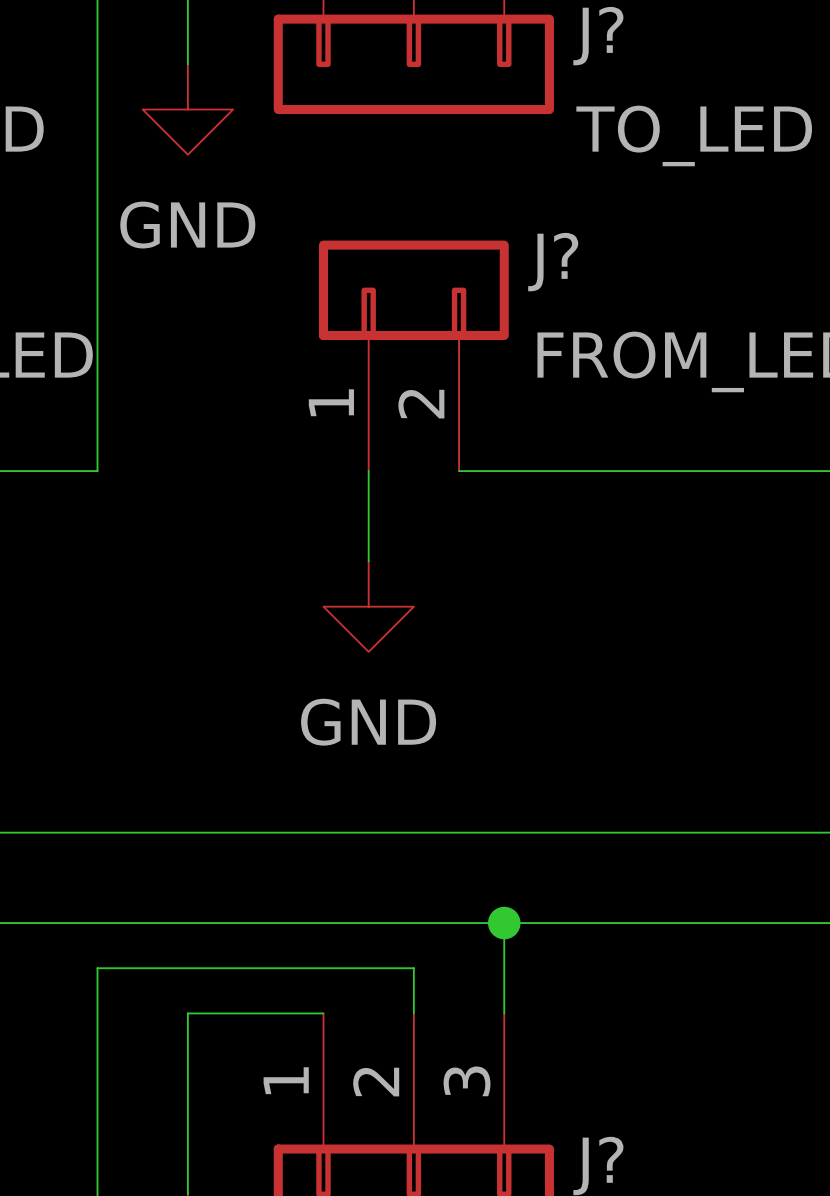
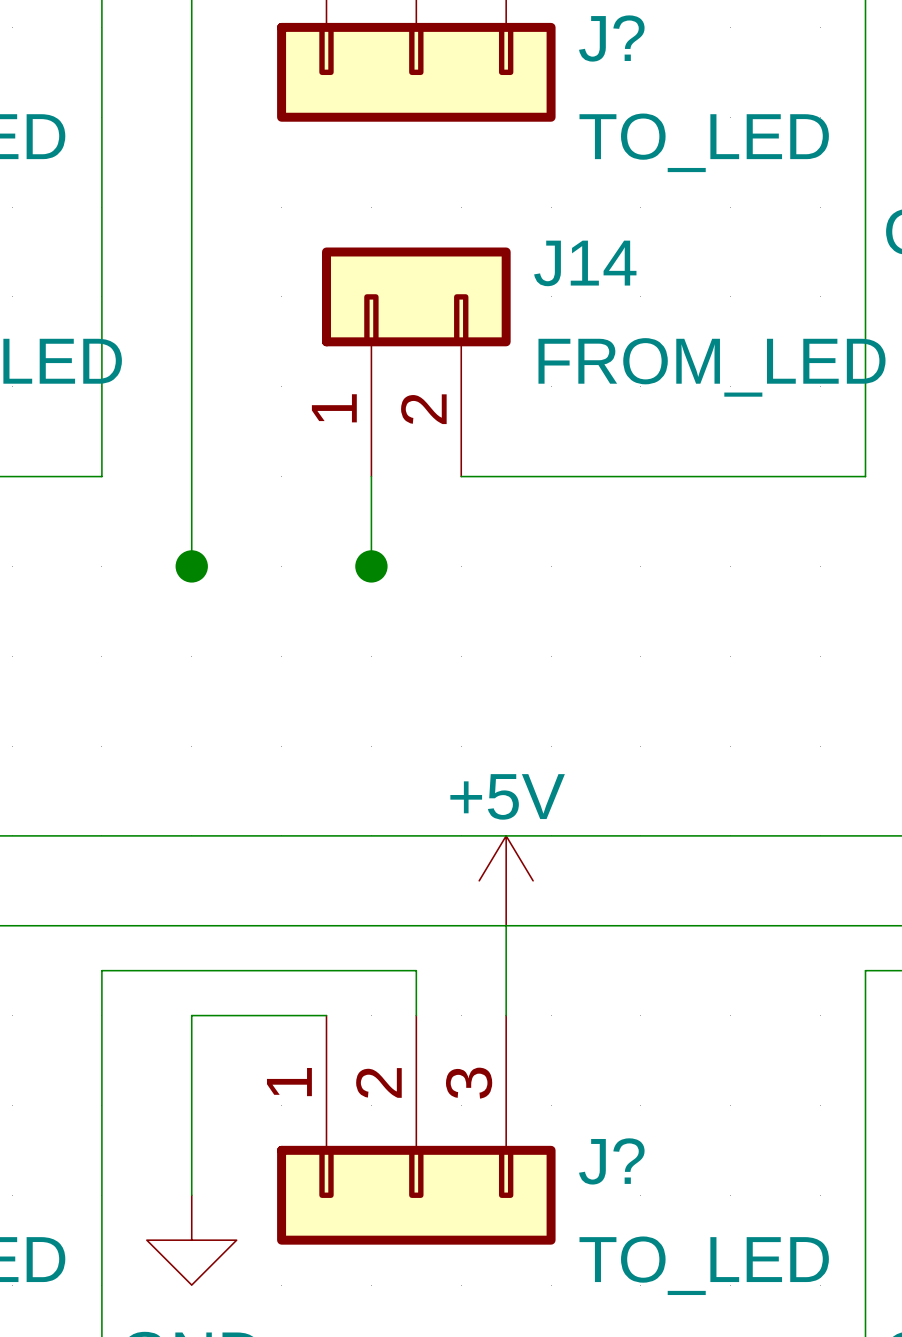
wire: none -> (191, 72) (191, 566)
power symbol: GND (187, 109) -> none
J? name: J? (553, 262) -> J14 (585, 263)
junction: none -> (191, 566)
junction: none -> (371, 566)
power symbol: GND (368, 606) -> none
power symbol: none -> +5V (506, 880)
junction: (504, 923) -> none

